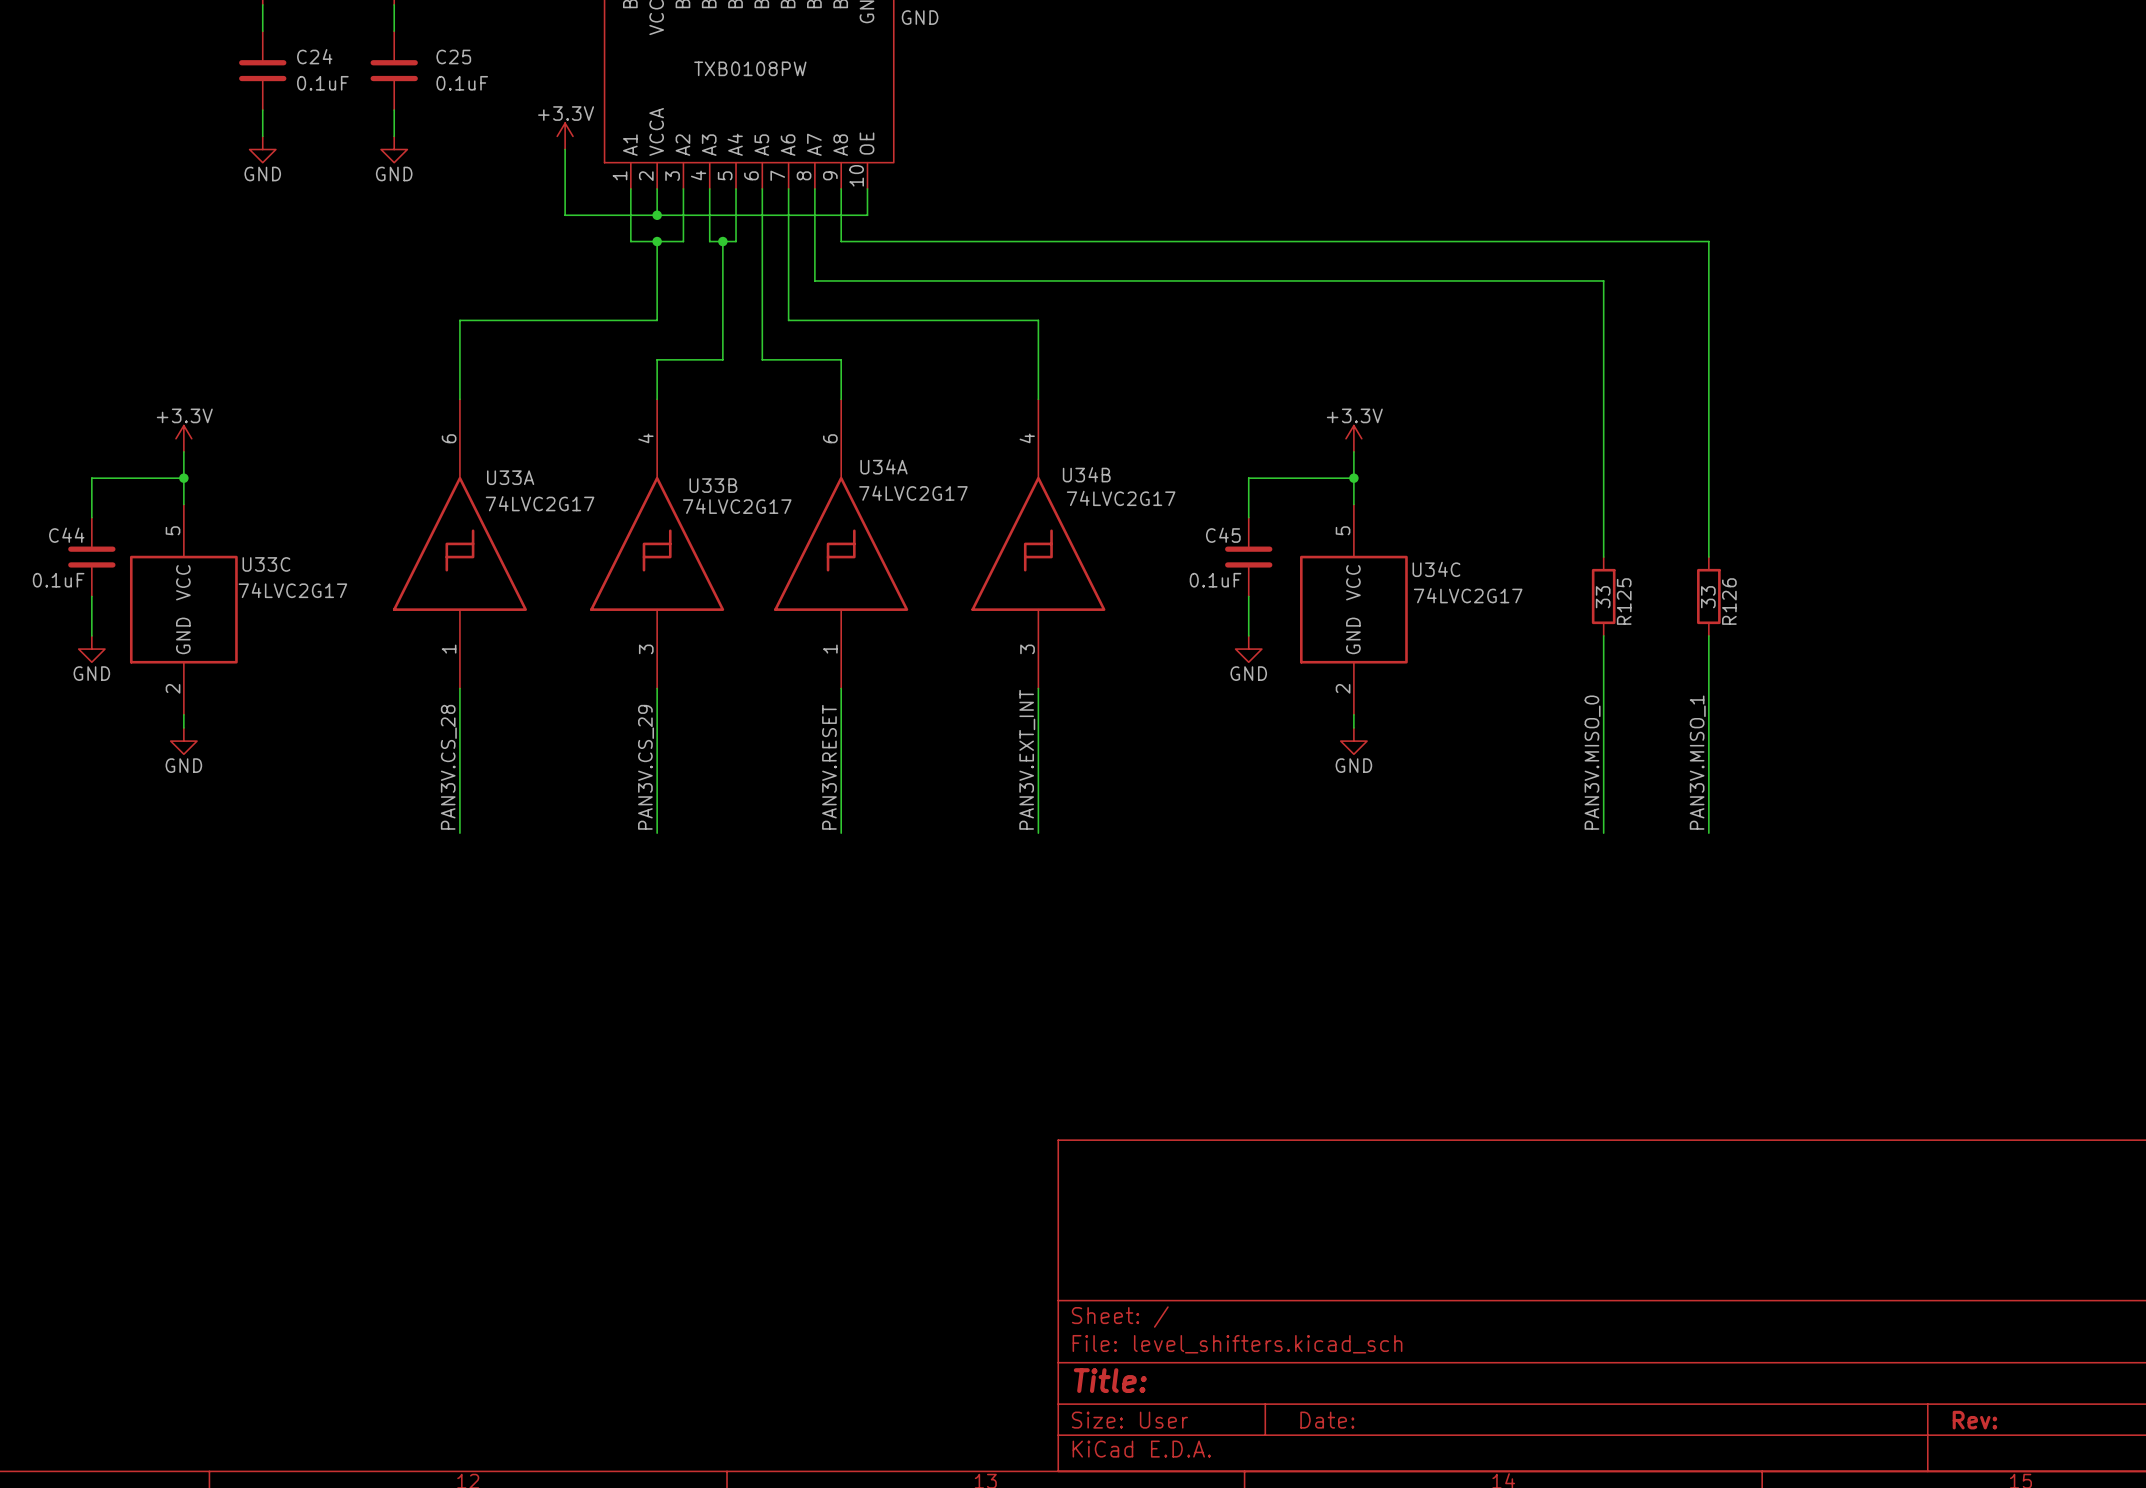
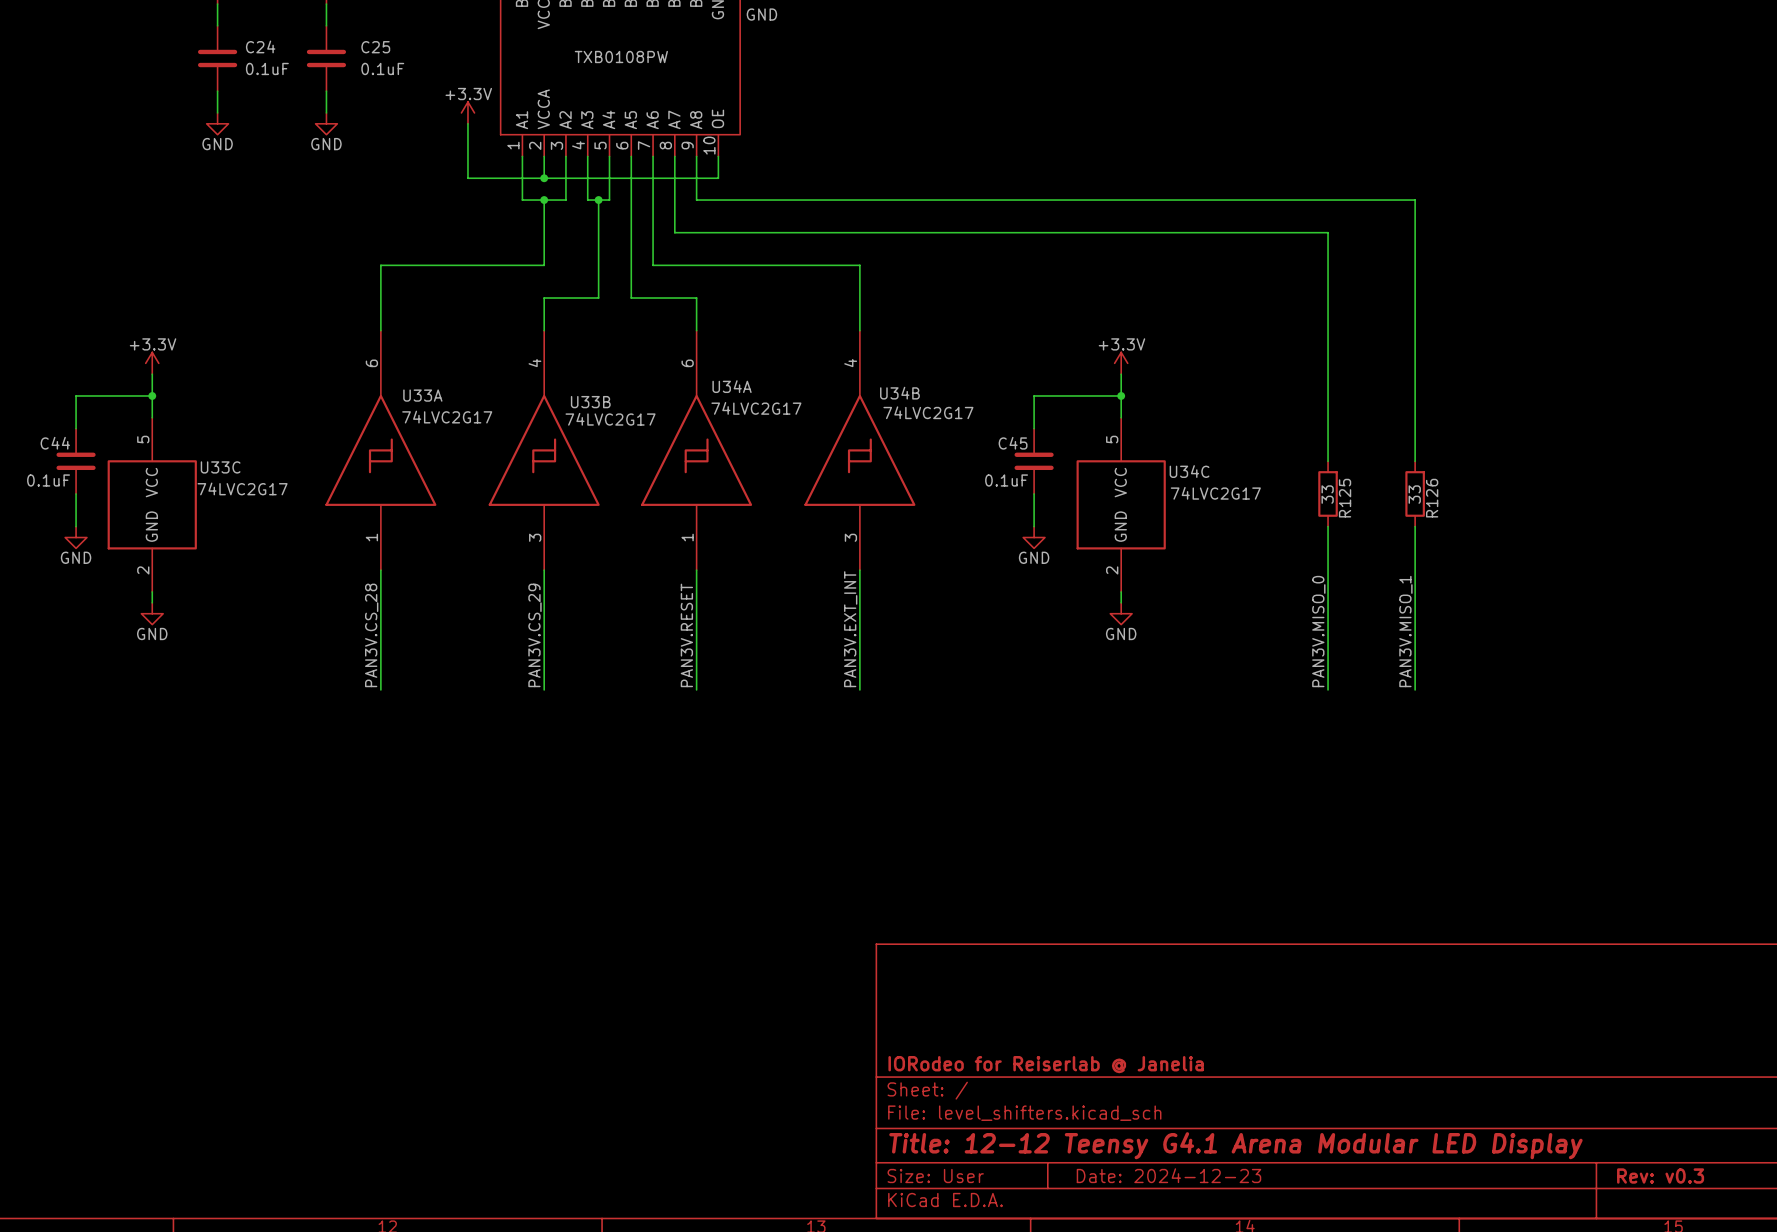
title block: none -> IORodeo for Reiserlab @ Janelia (1046, 1064)
title block: Title: (1110, 1380) -> Title: 12-12 Teensy G4.1 Arena Modular LED Display (1235, 1145)
title block: Date: (1327, 1420) -> Date: 2024-12-23 (1168, 1175)
title block: Rev: (1974, 1420) -> Rev: v0.3 (1660, 1176)

